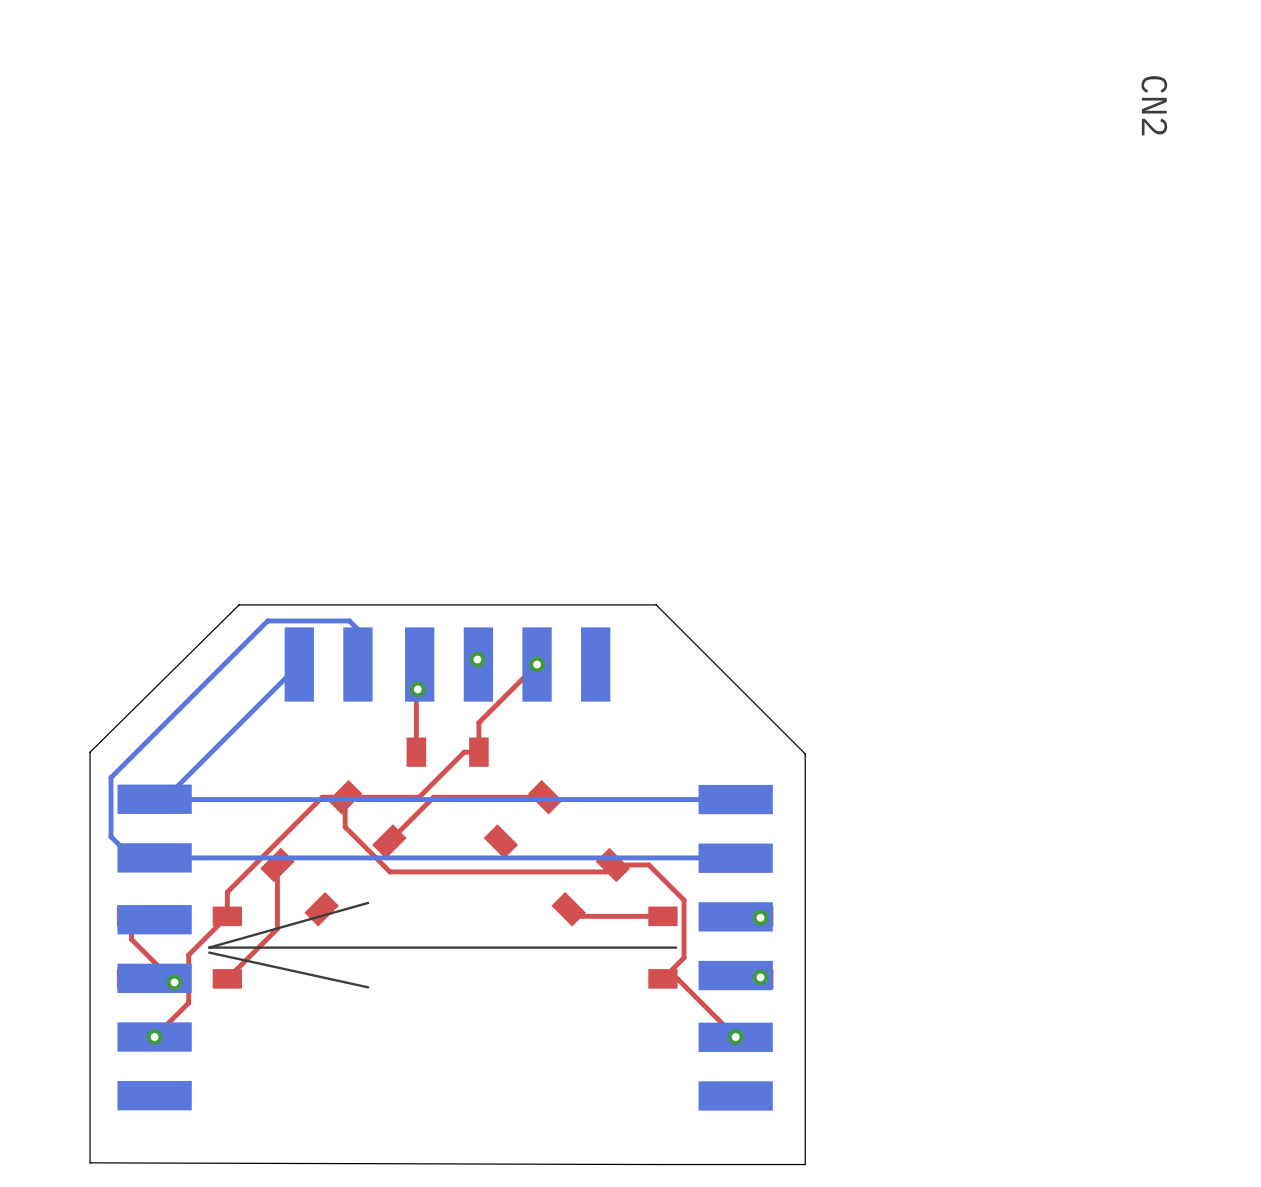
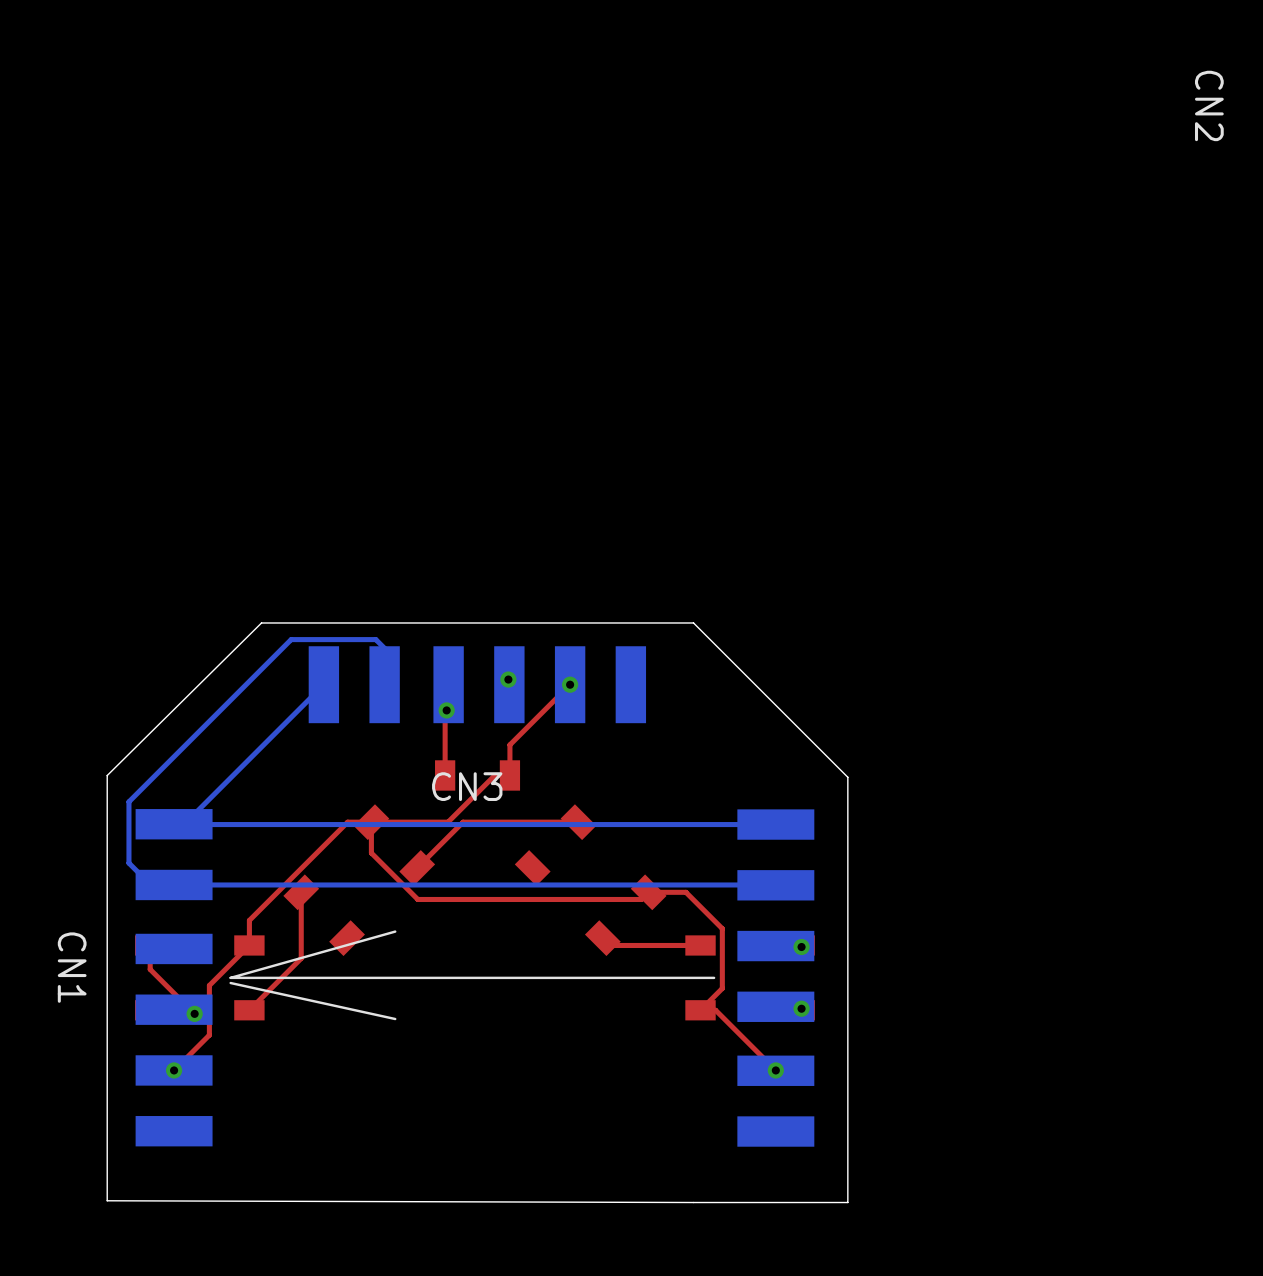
CN3 name: none -> CN3 (467, 786)
CN1 name: none -> CN1 (72, 967)

